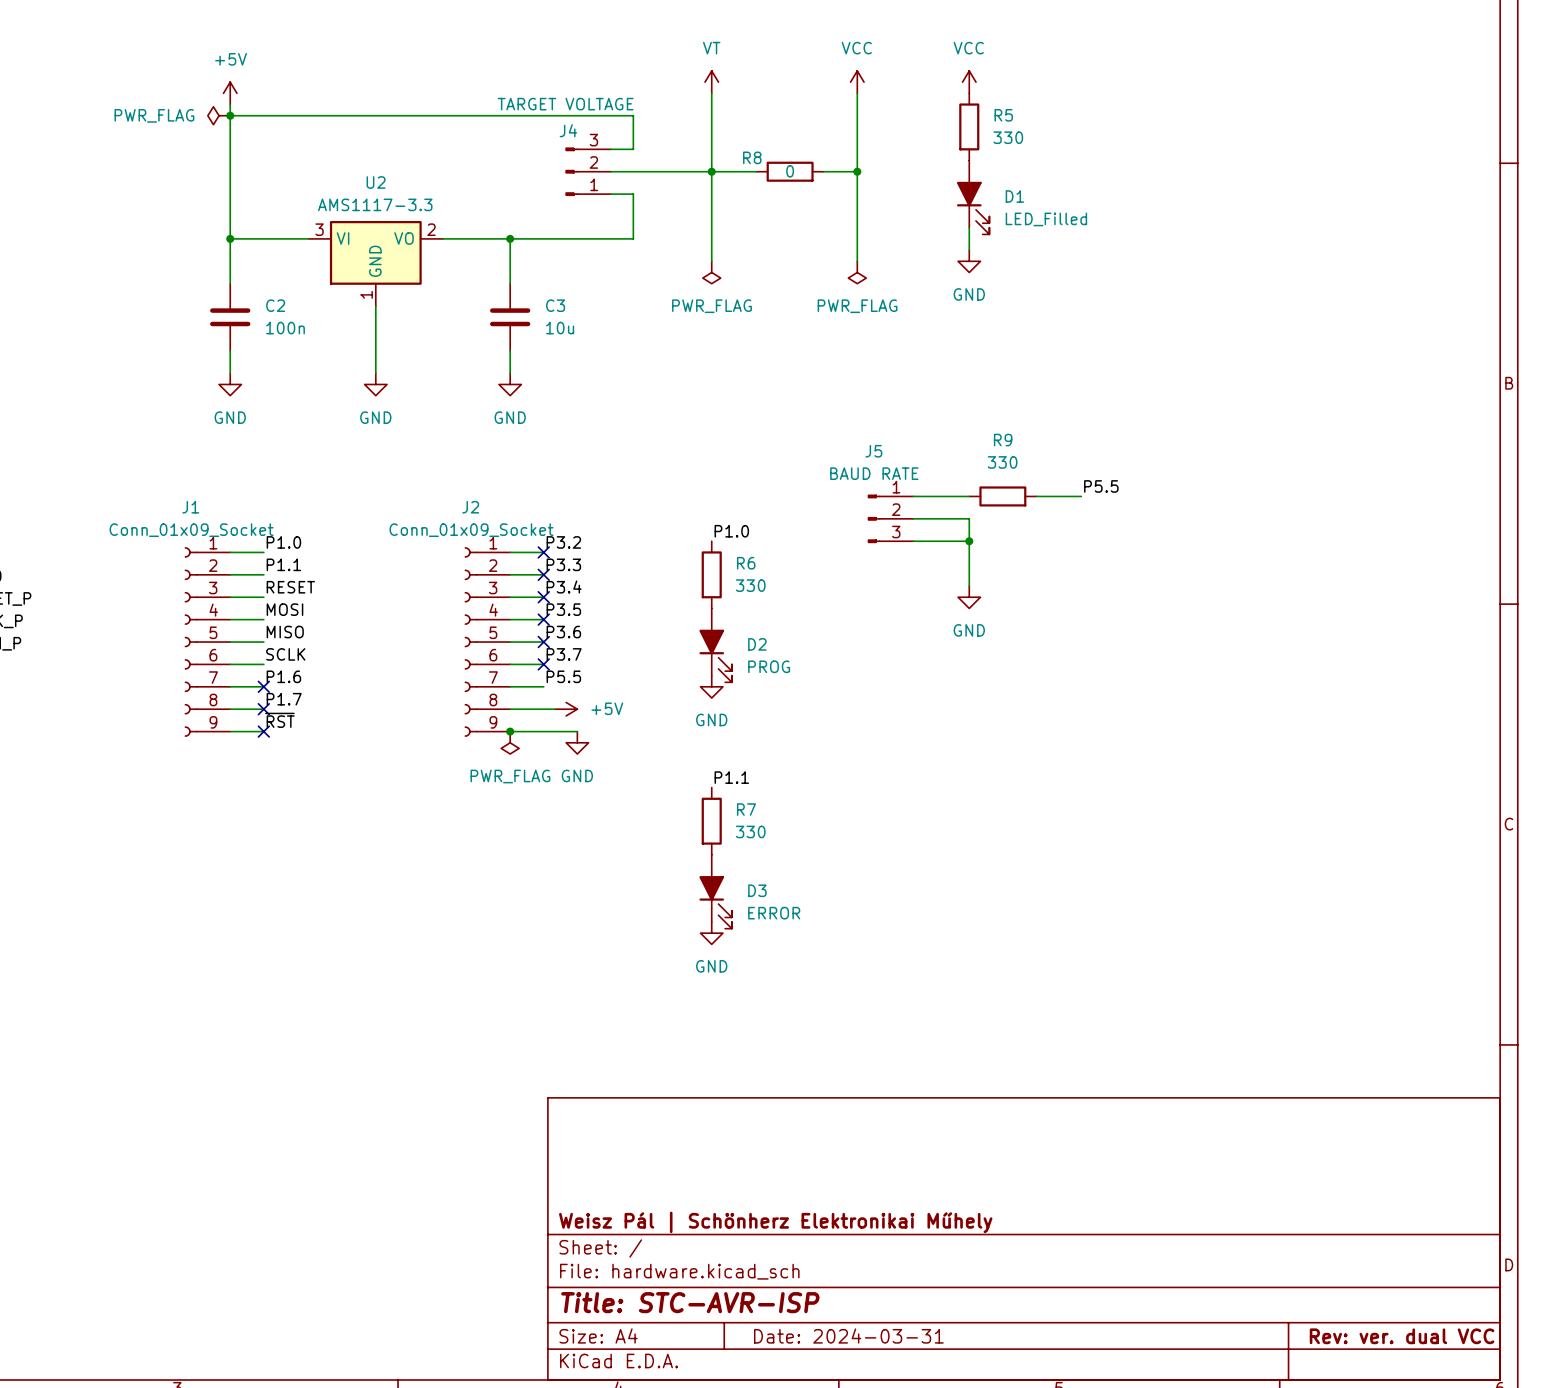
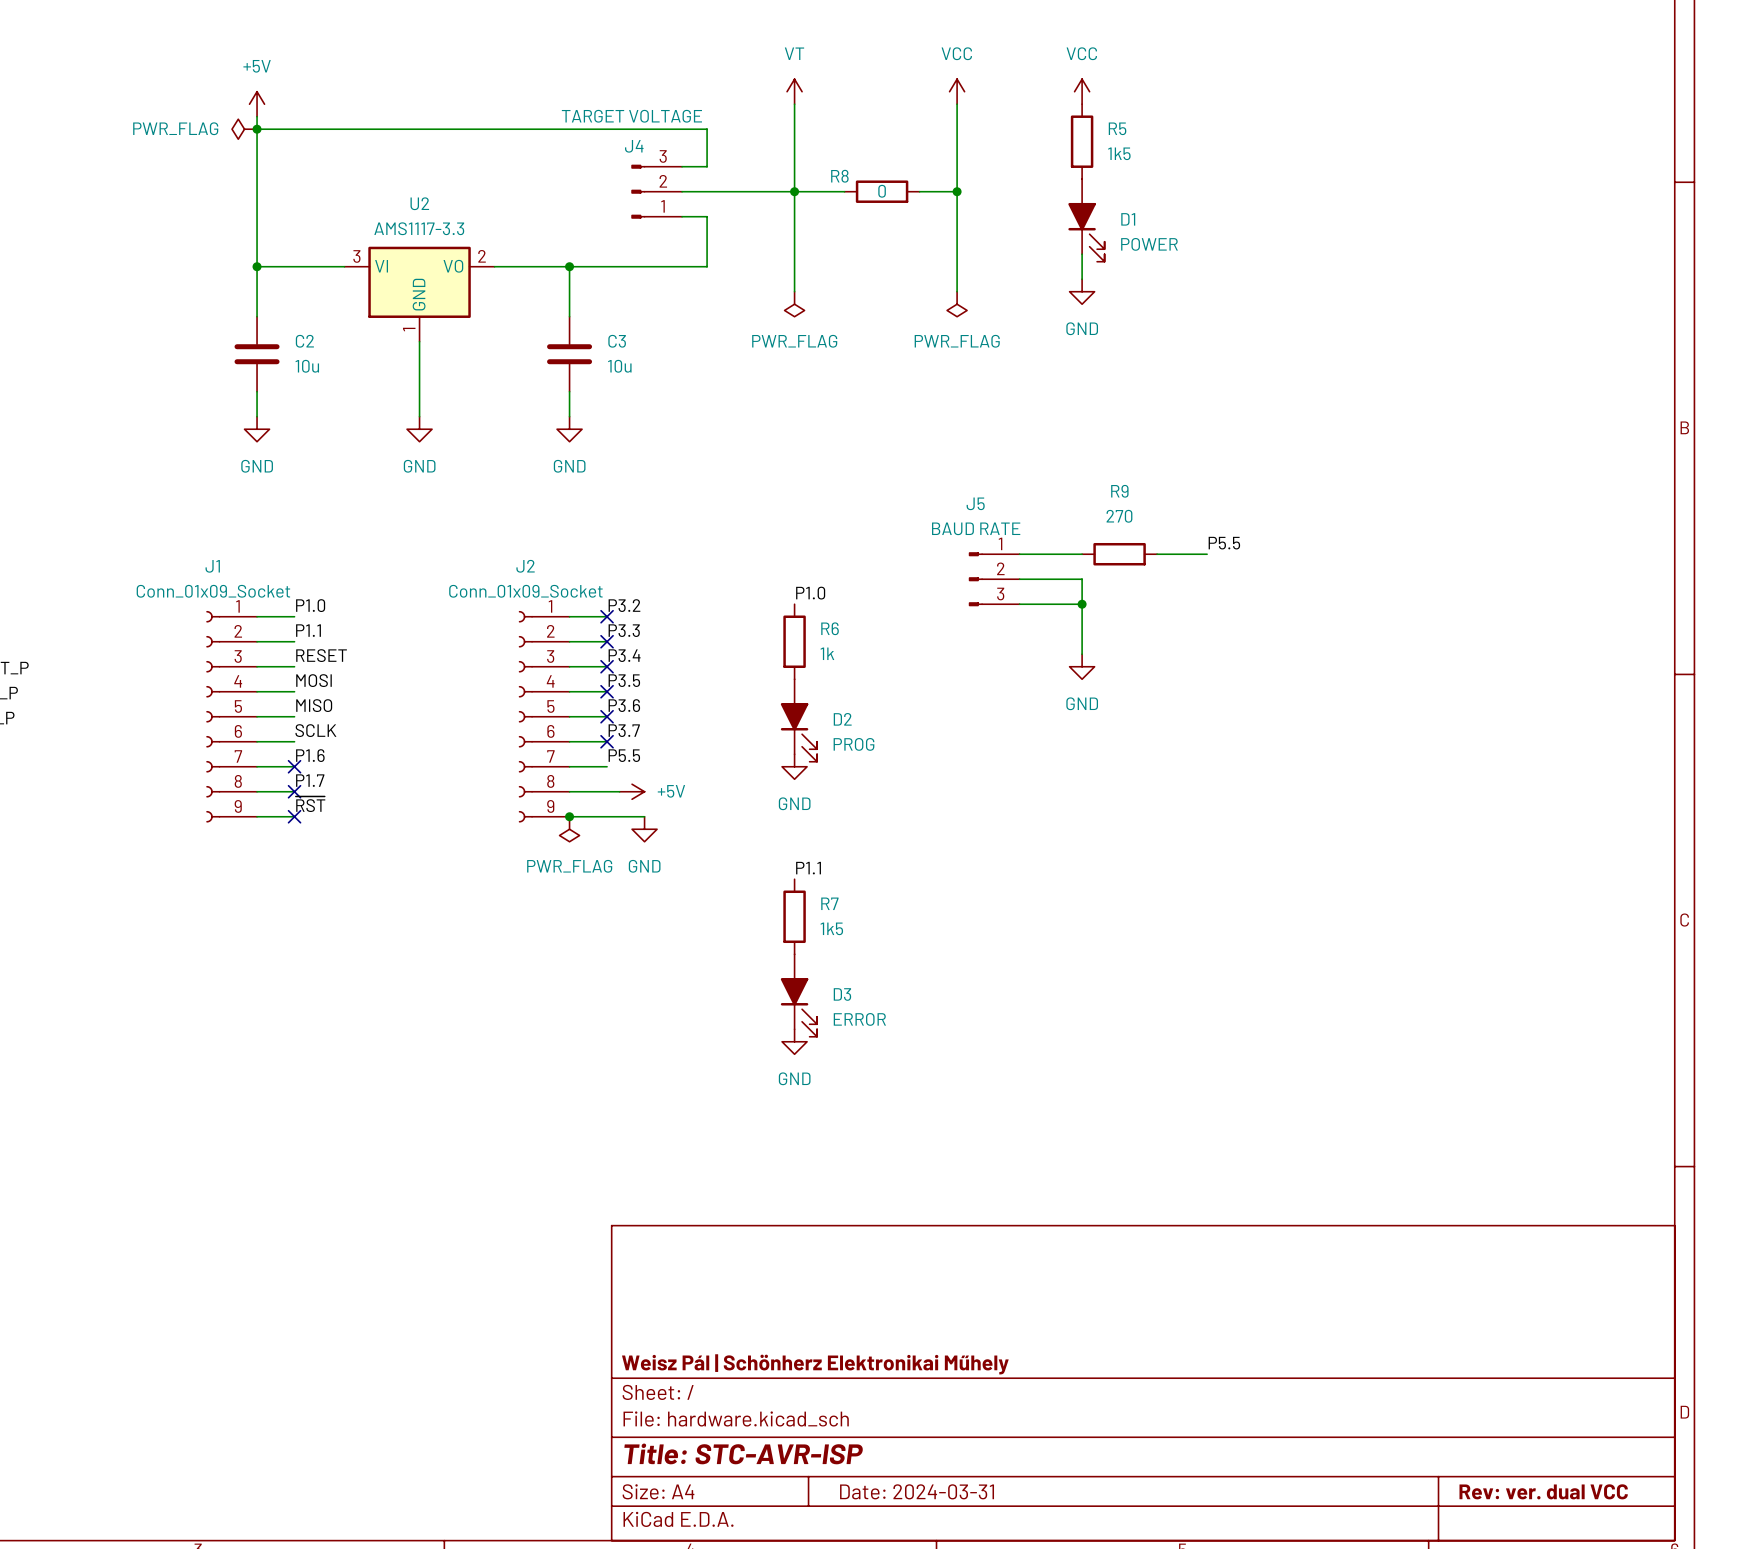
R5 value: 330 (1008, 137) -> 1k5 (1119, 153)
D1 value: LED_Filled (1046, 219) -> POWER (1149, 244)
C2 value: 100n (285, 328) -> 10u (307, 366)
R9 value: 330 (1002, 462) -> 270 (1119, 516)
R6 value: 330 (750, 585) -> 1k (827, 653)
R7 value: 330 (750, 831) -> 1k5 (831, 928)

